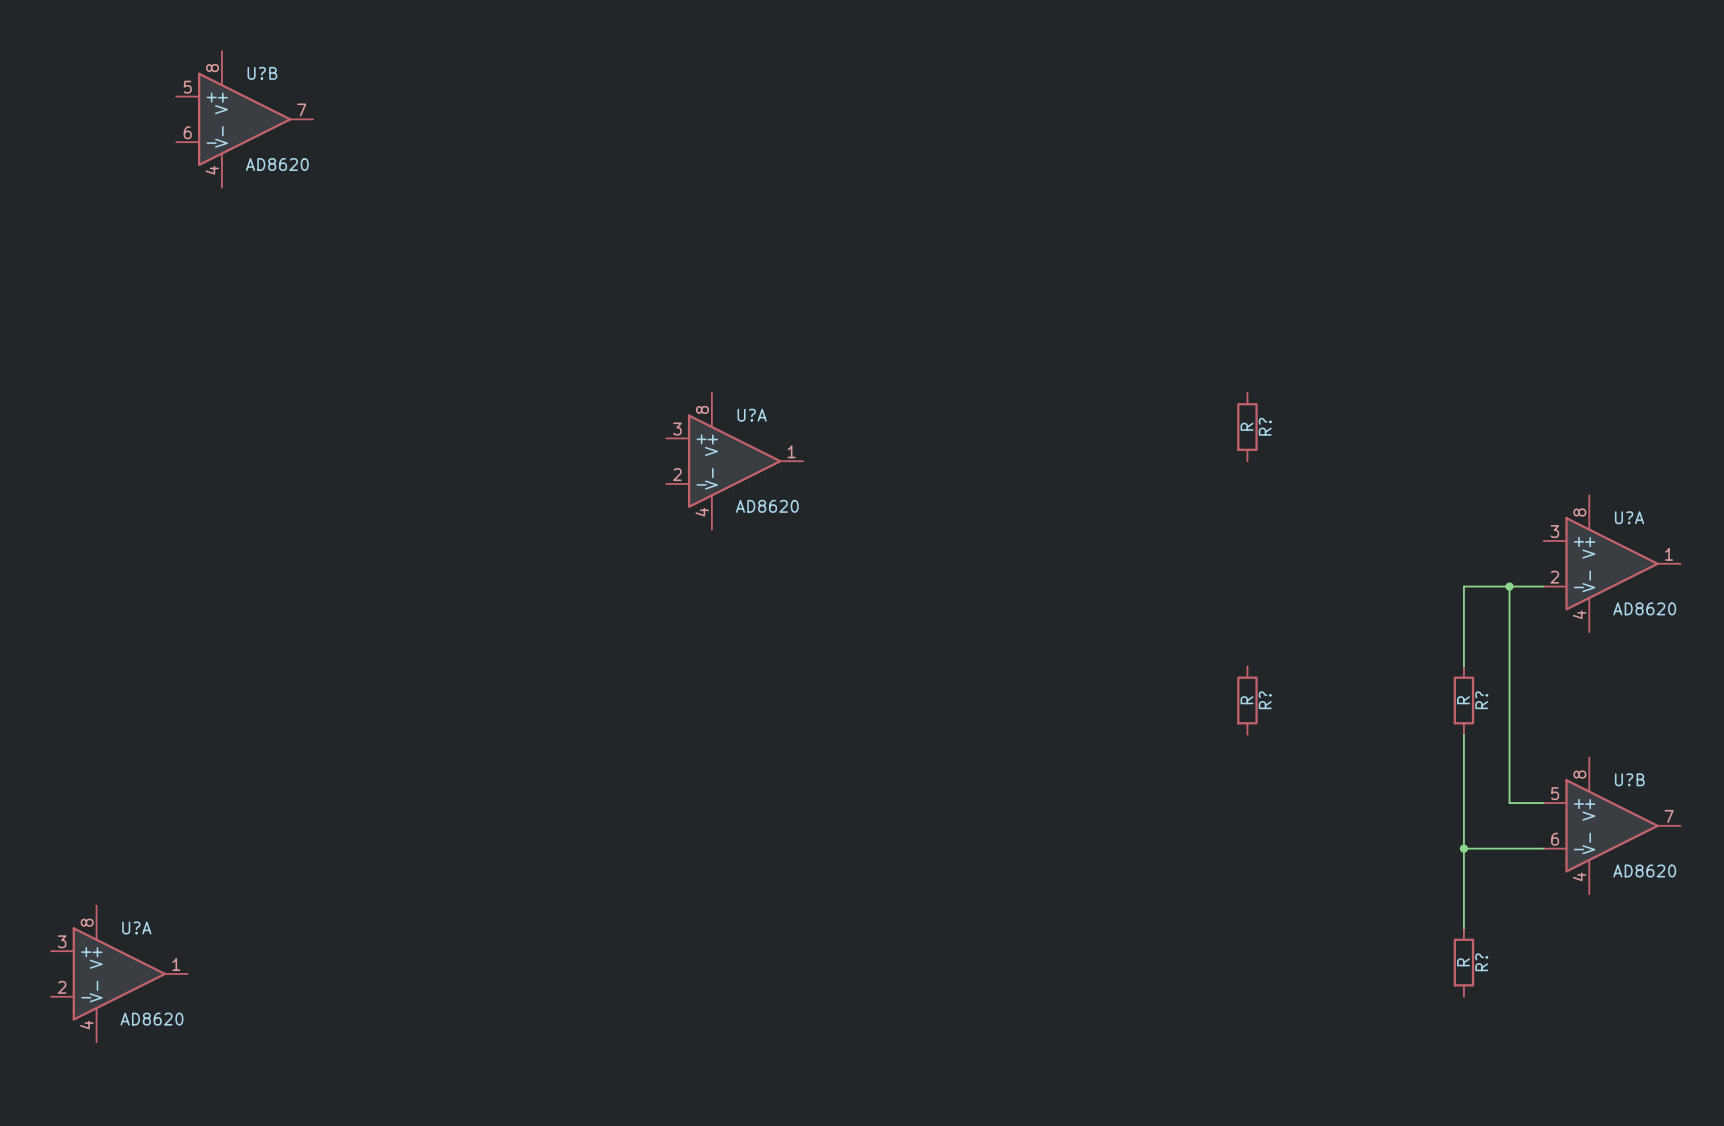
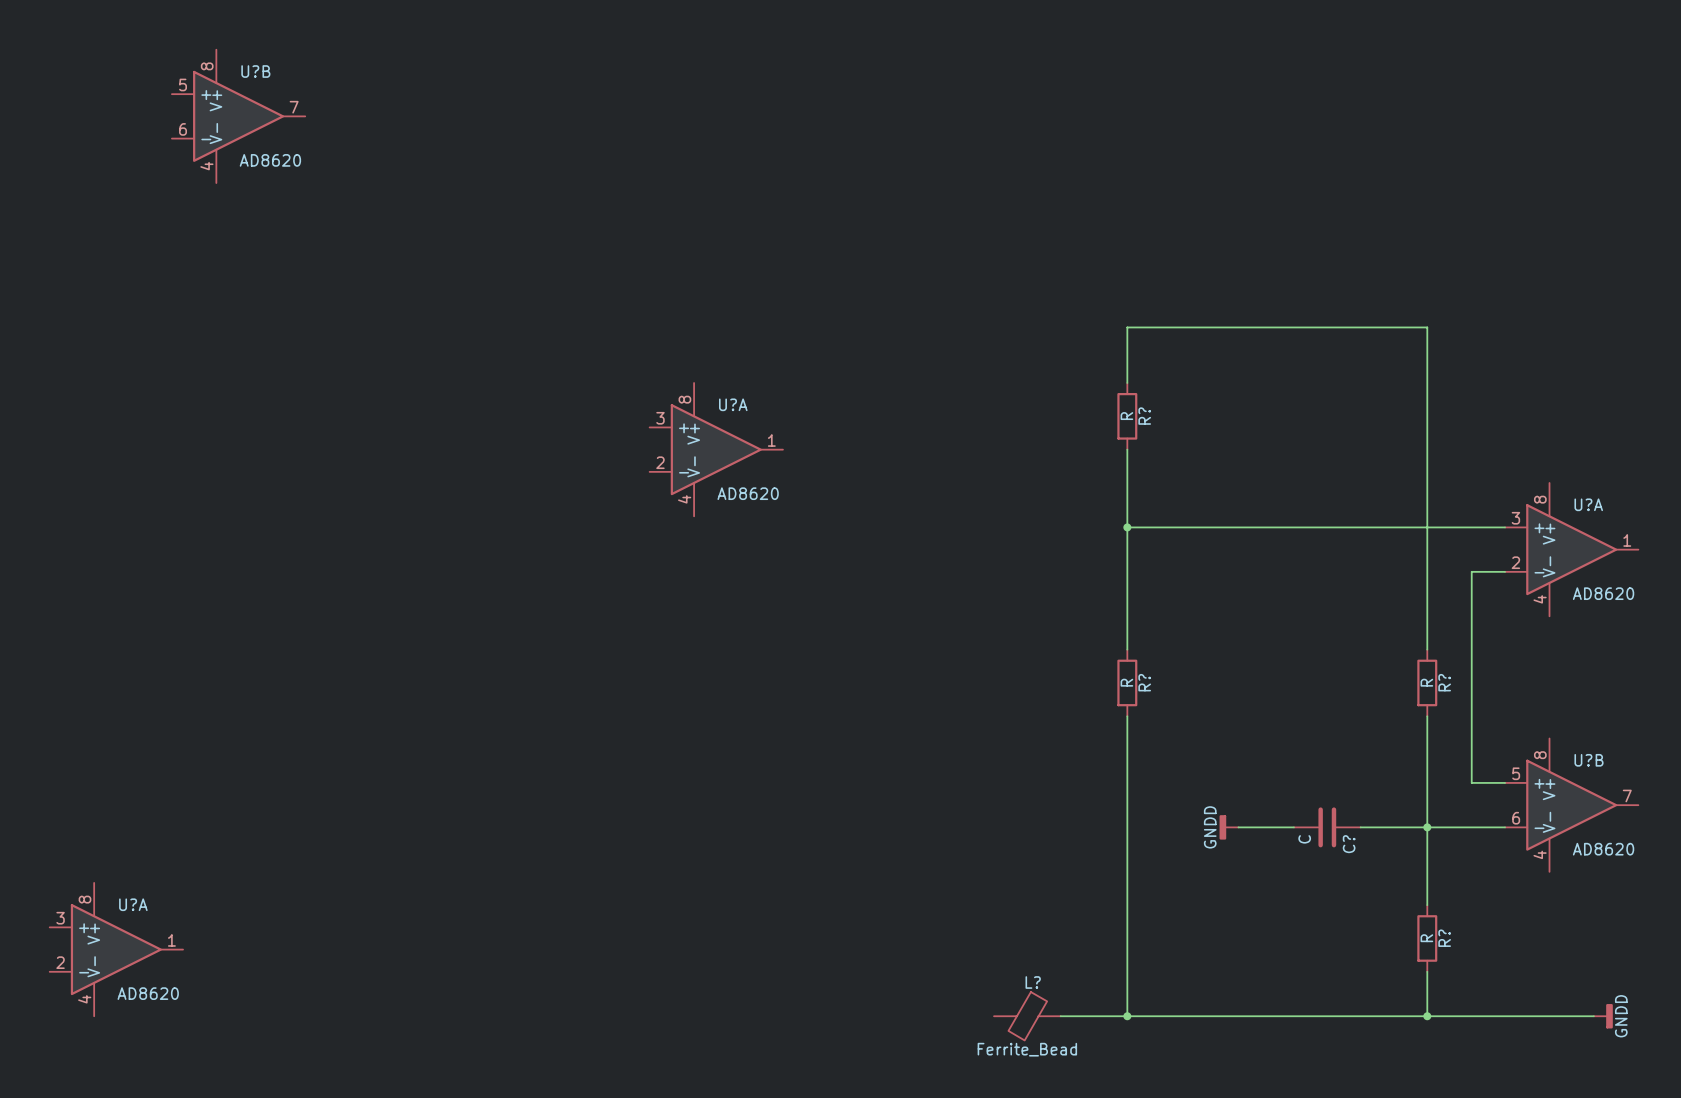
R? position: (1247, 427) -> (1127, 416)
wire: none -> (1127, 449) (1127, 649)
wire: none -> (1127, 527) (1505, 527)
junction: none -> (1127, 527)
wire: (1463, 586) (1509, 586) -> (1427, 571) (1427, 327) (1127, 327) (1127, 383)
junction: (1509, 586) -> none
R? position: (1247, 700) -> (1127, 682)
wire: none -> (1127, 716) (1127, 1016)
power symbol: none -> GNDD (1228, 827)
wire: none -> (1238, 827) (1293, 827)
C?: none -> C (1327, 827)
wire: none -> (1360, 827) (1427, 827)
wire: none -> (1427, 971) (1427, 1016)
L?: none -> Ferrite_Bead (1027, 1016)
wire: none -> (1060, 1016) (1593, 1016)
junction: none -> (1127, 1016)
junction: none -> (1427, 1016)
power symbol: none -> GNDD (1603, 1016)

